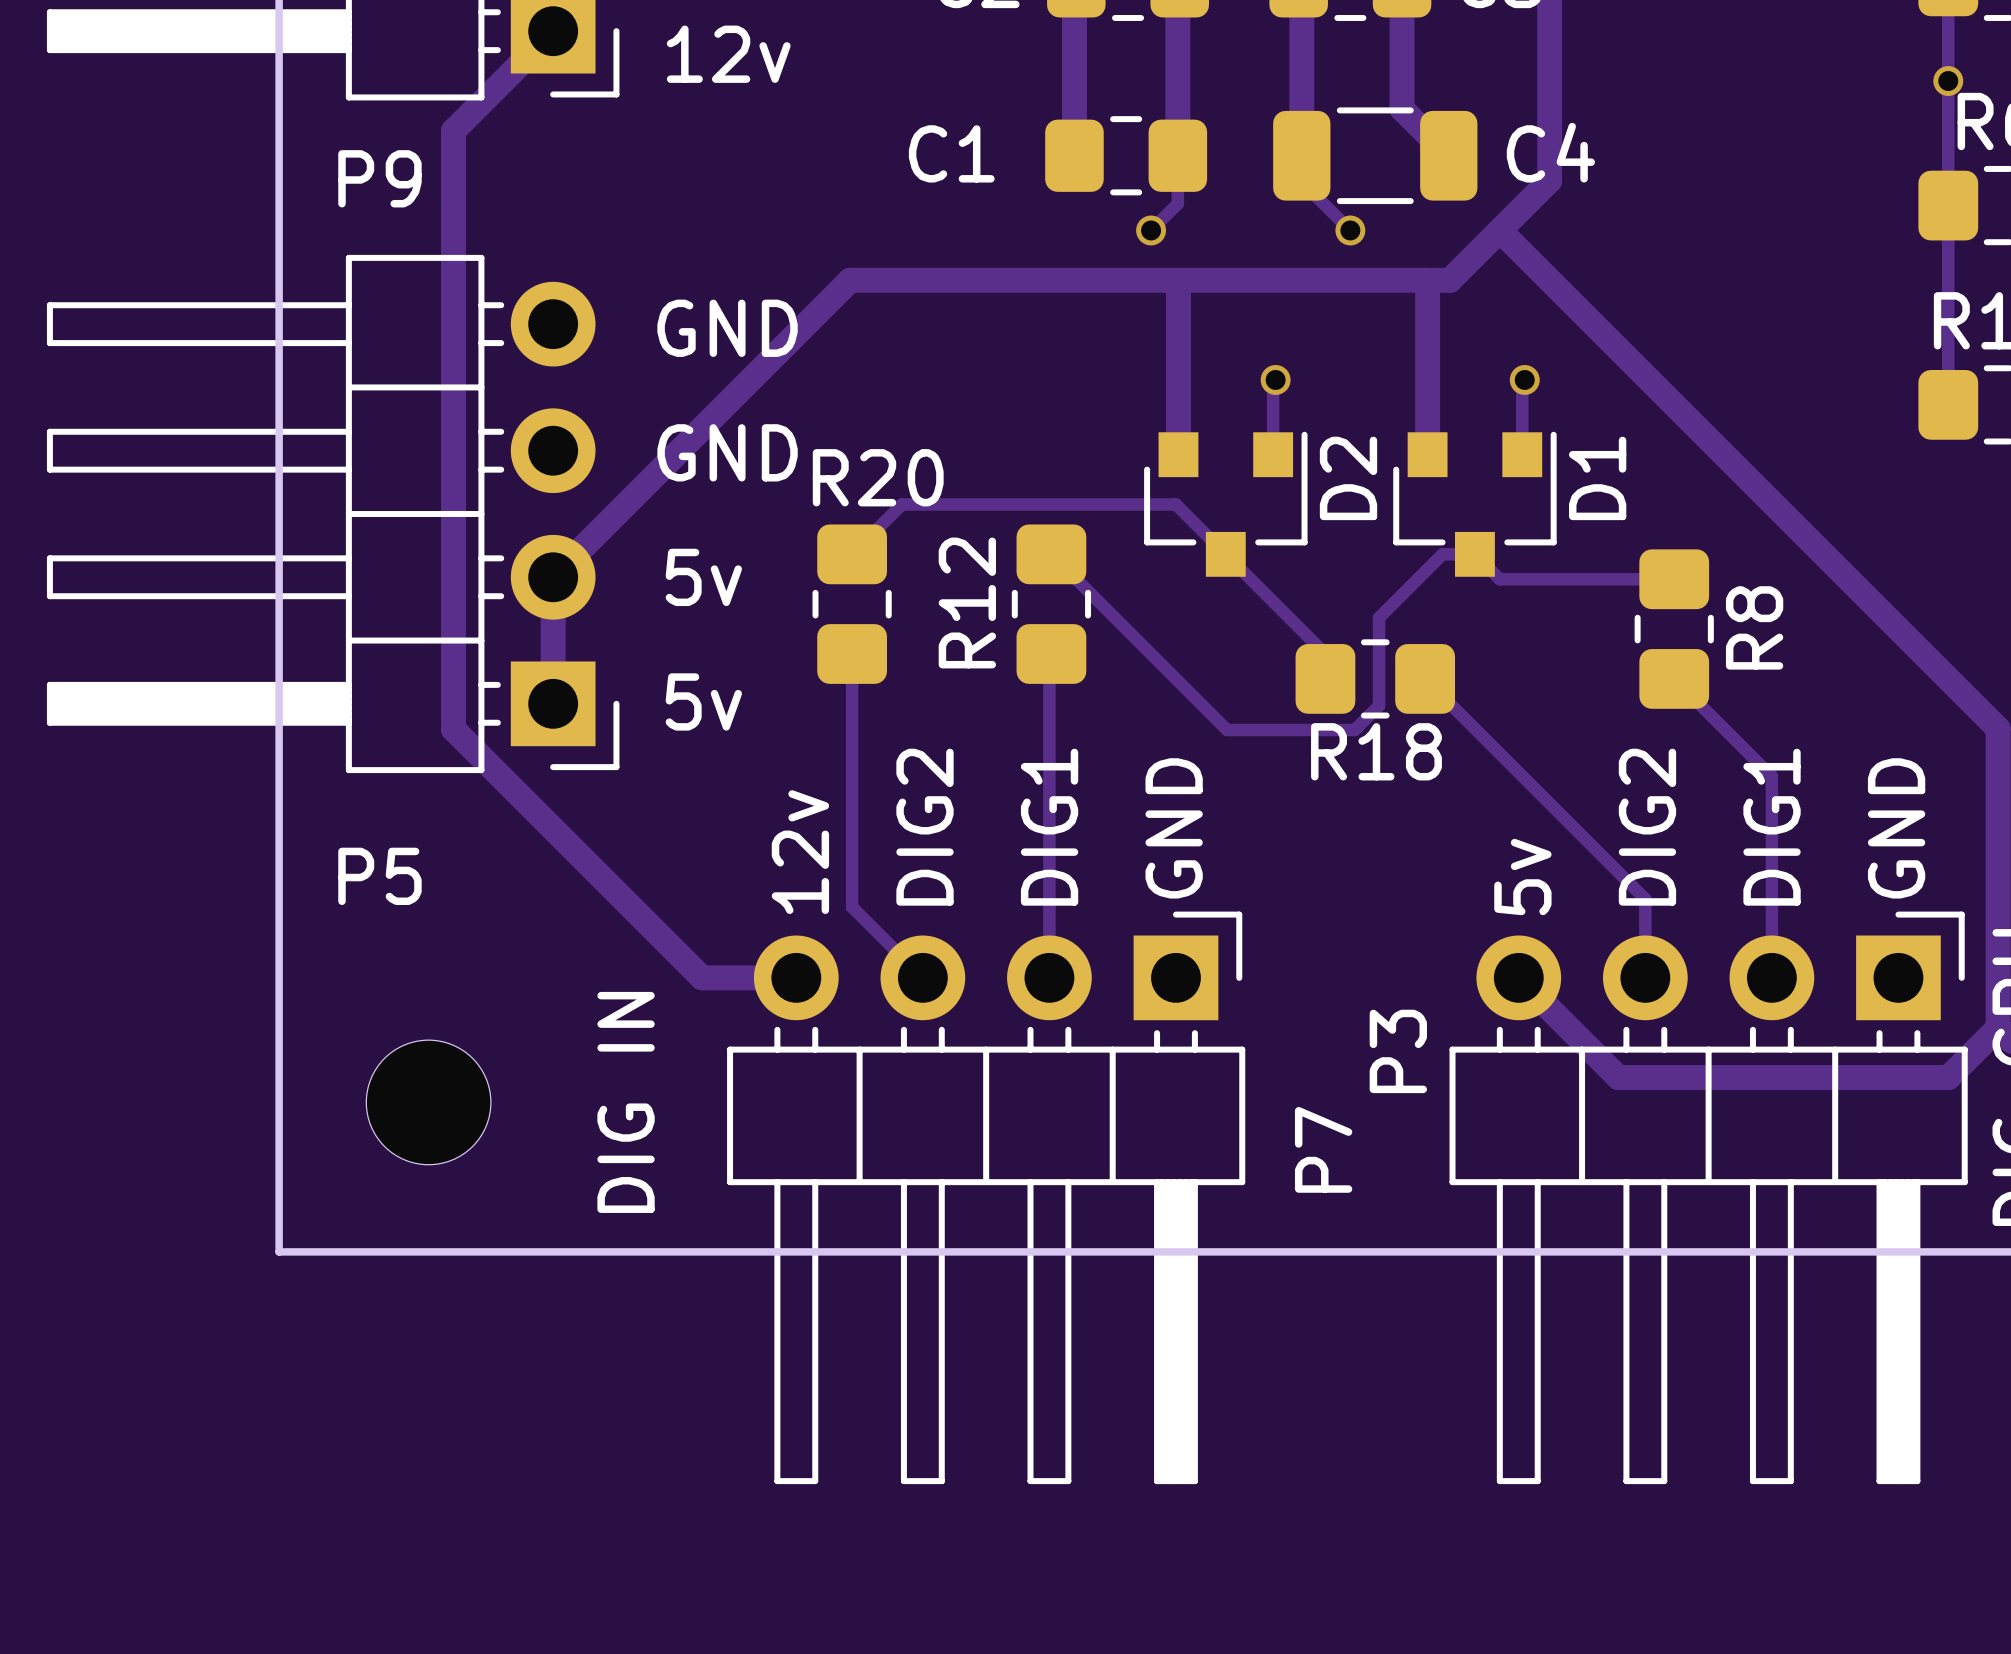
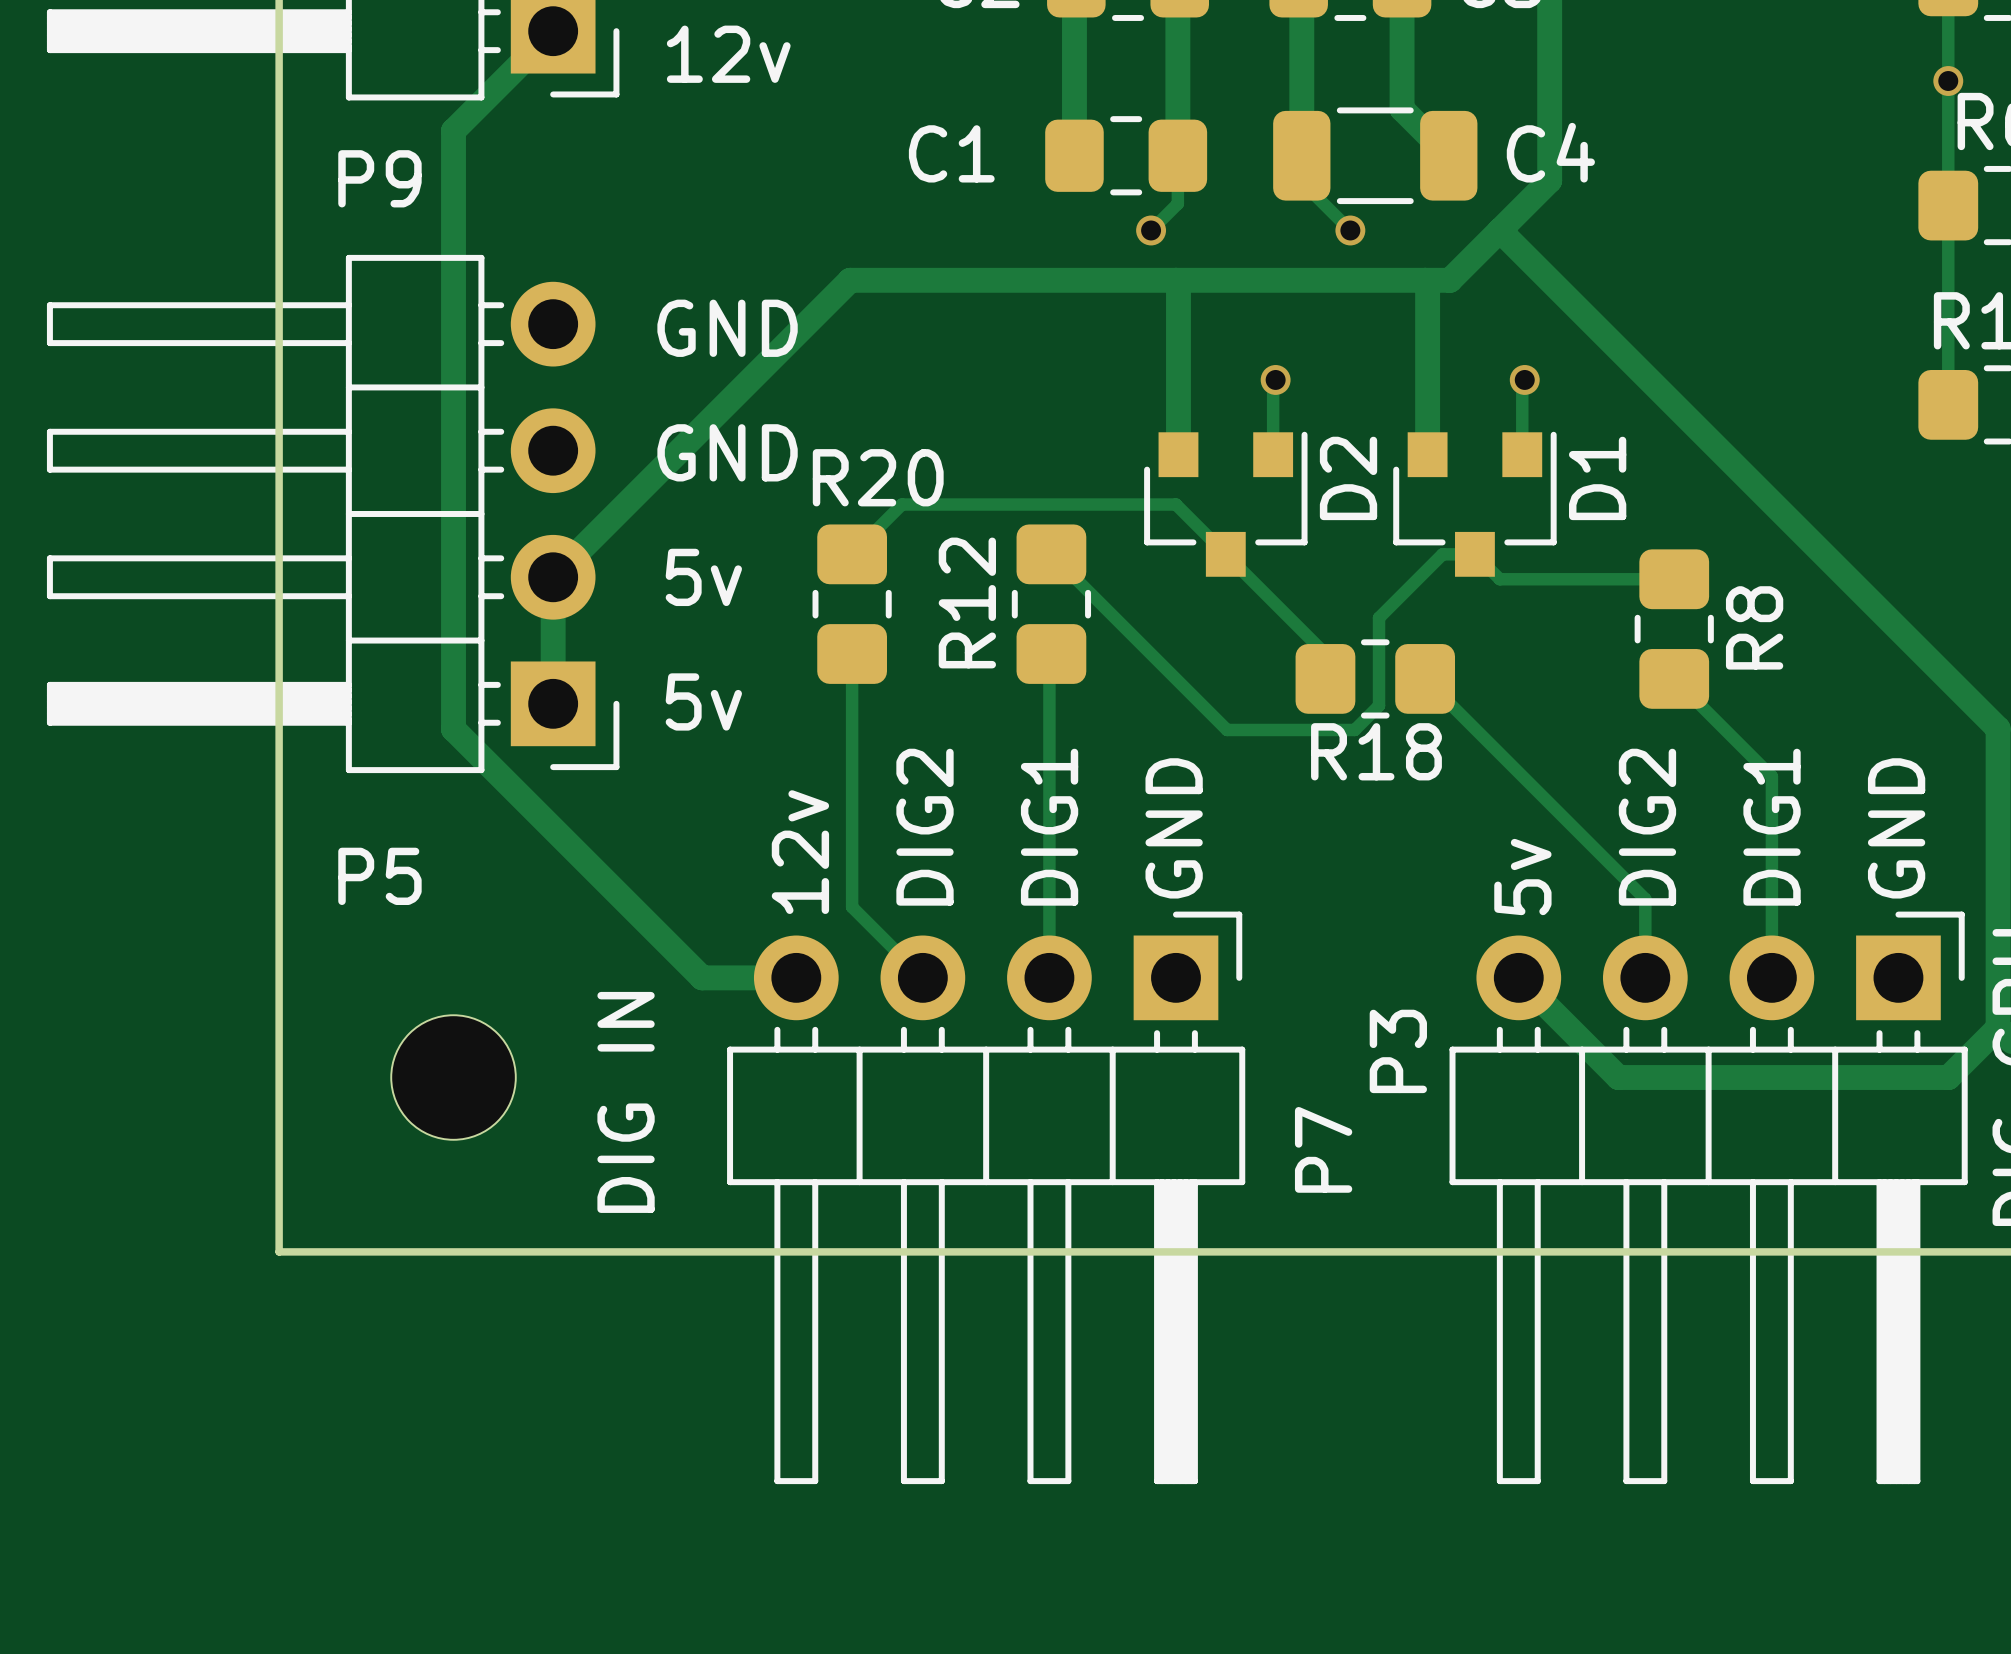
part position: (428, 1102) -> (453, 1077)

